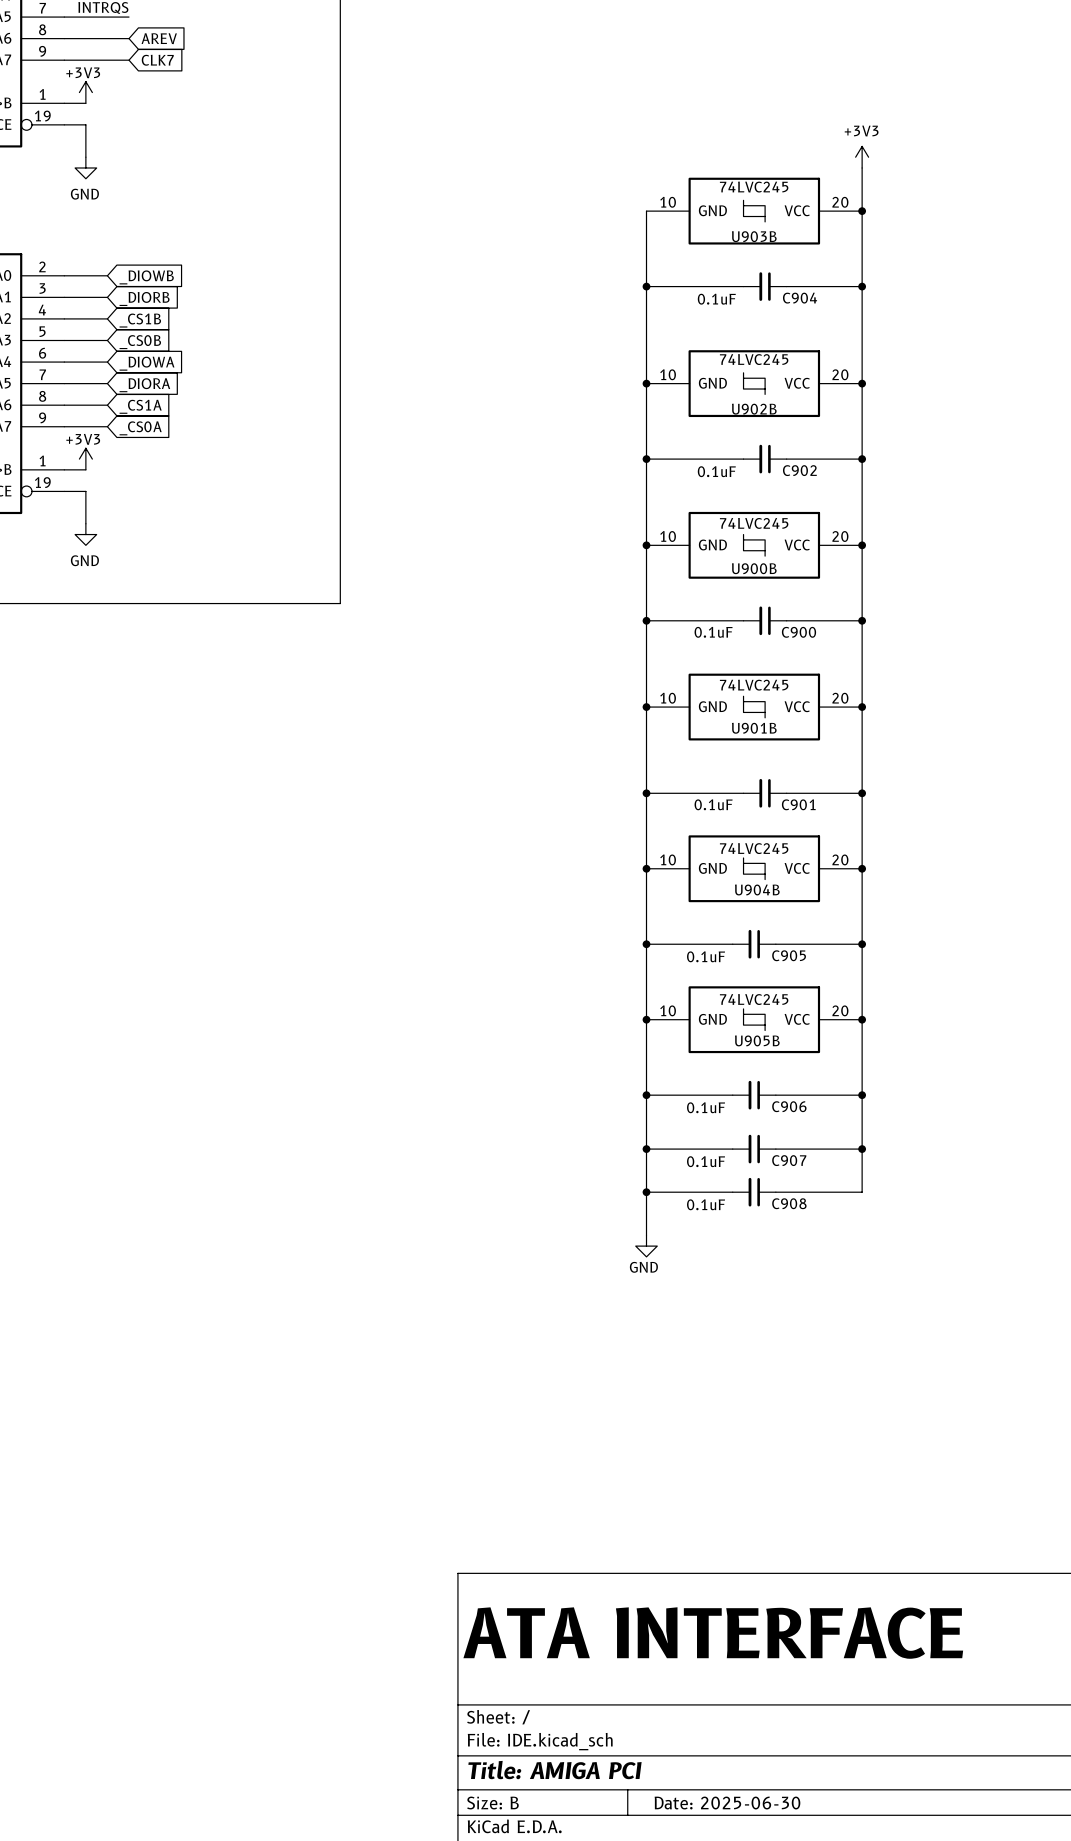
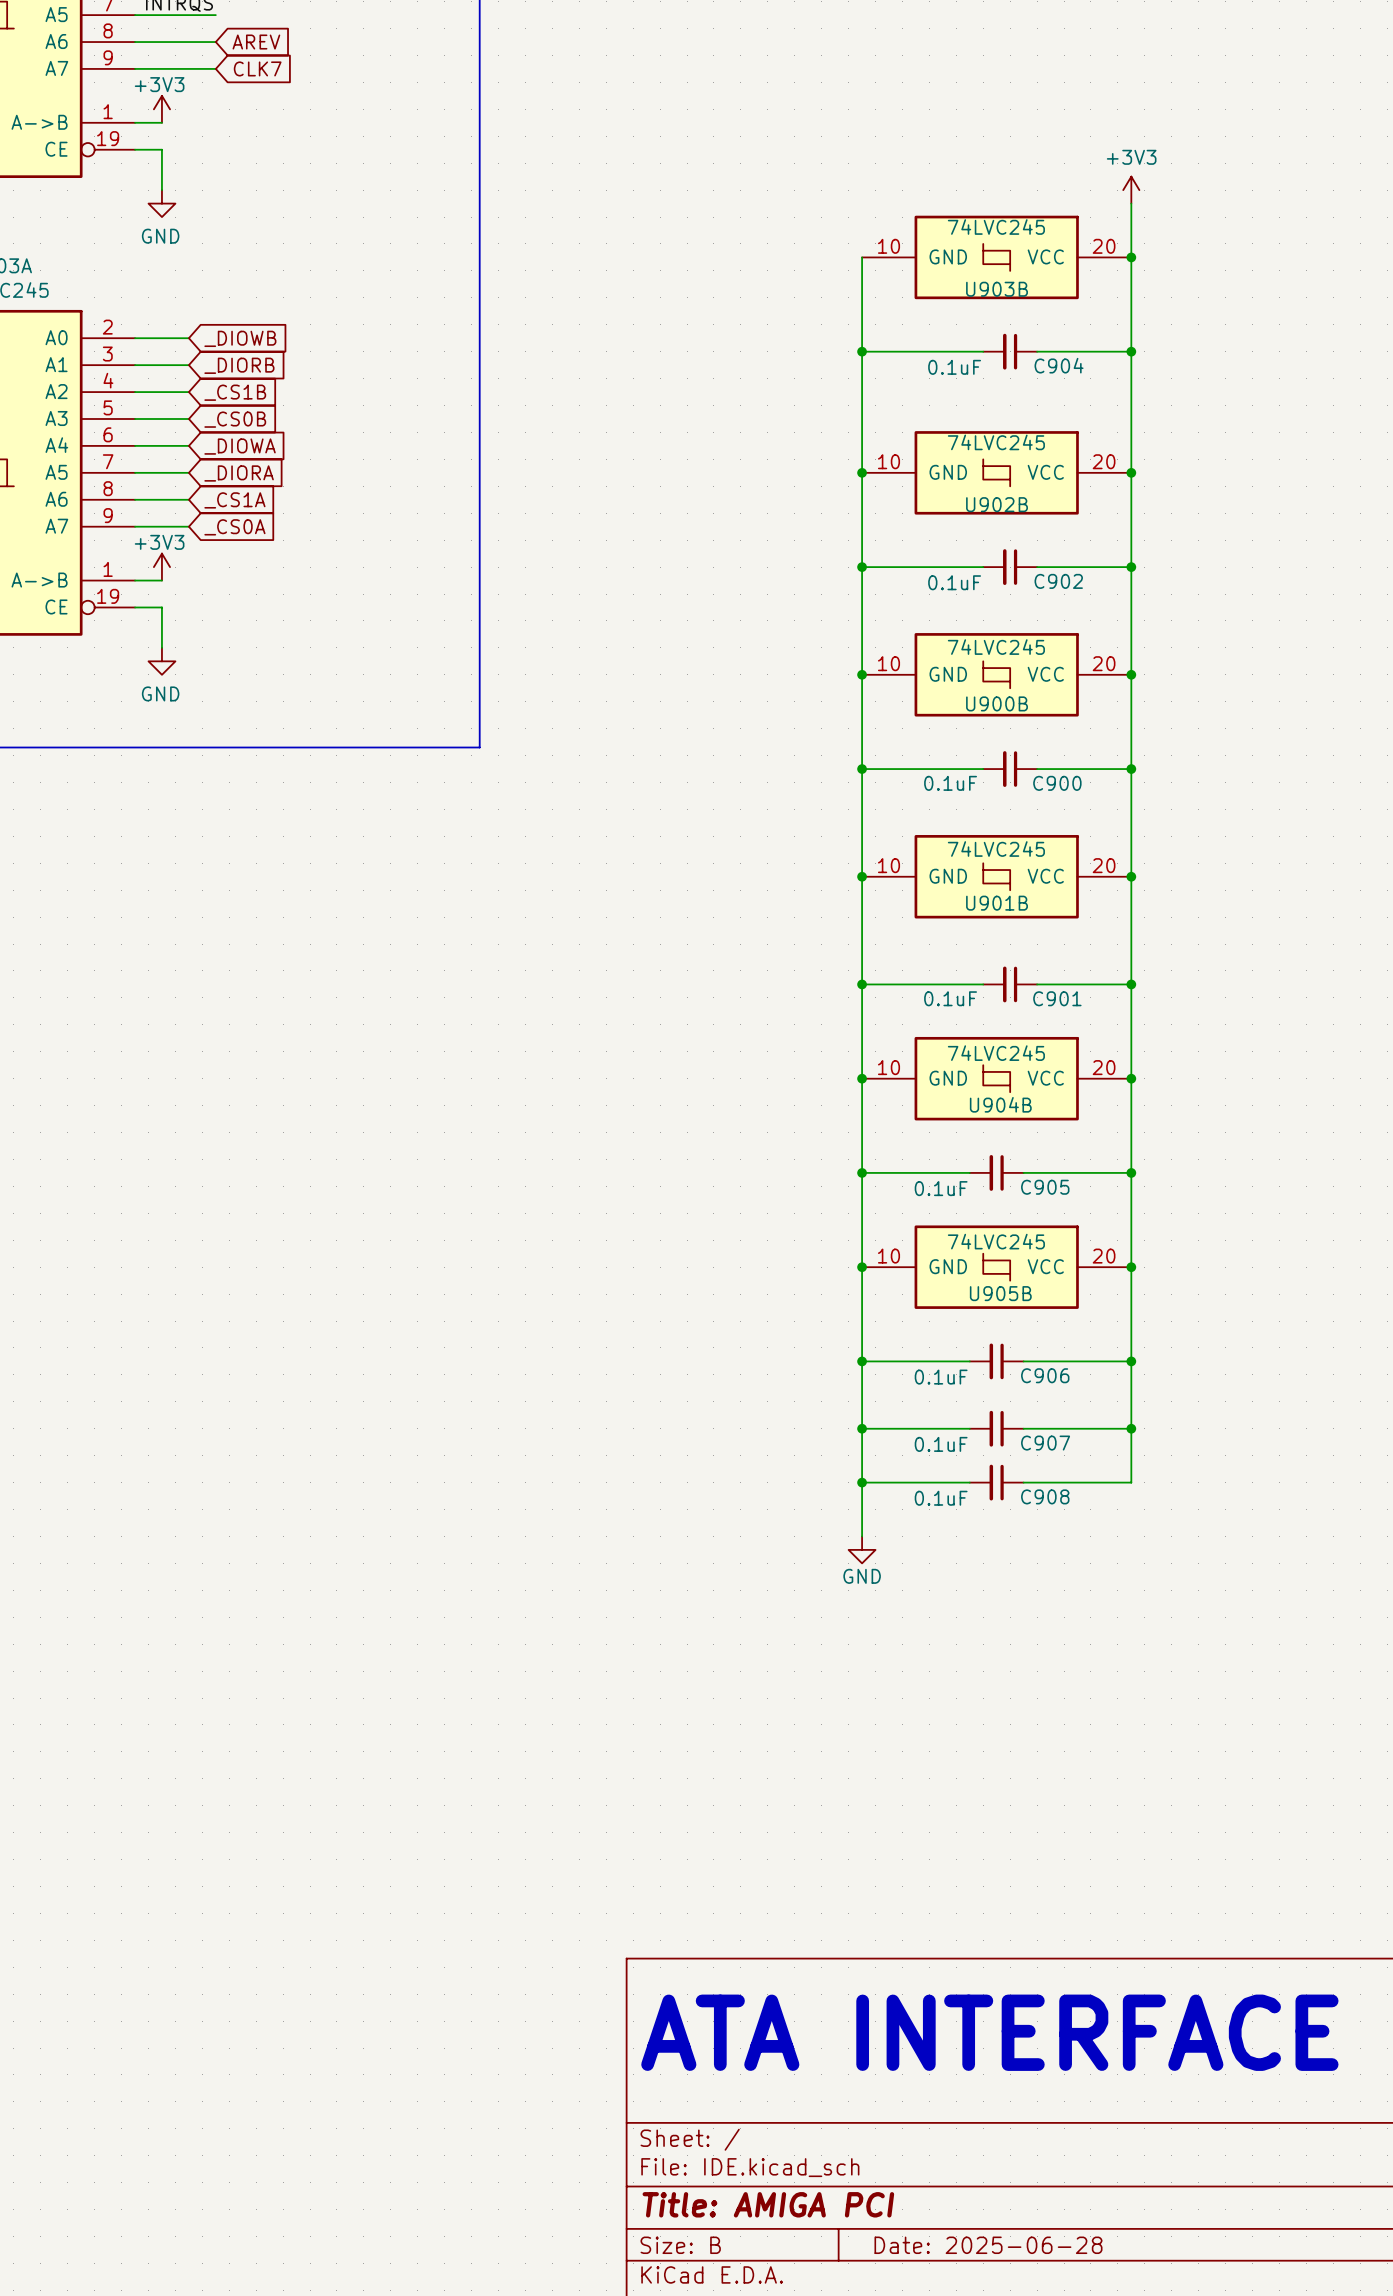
title block: Date: 2025-06-30 (727, 1803) -> Date: 2025-06-28 (988, 2245)

